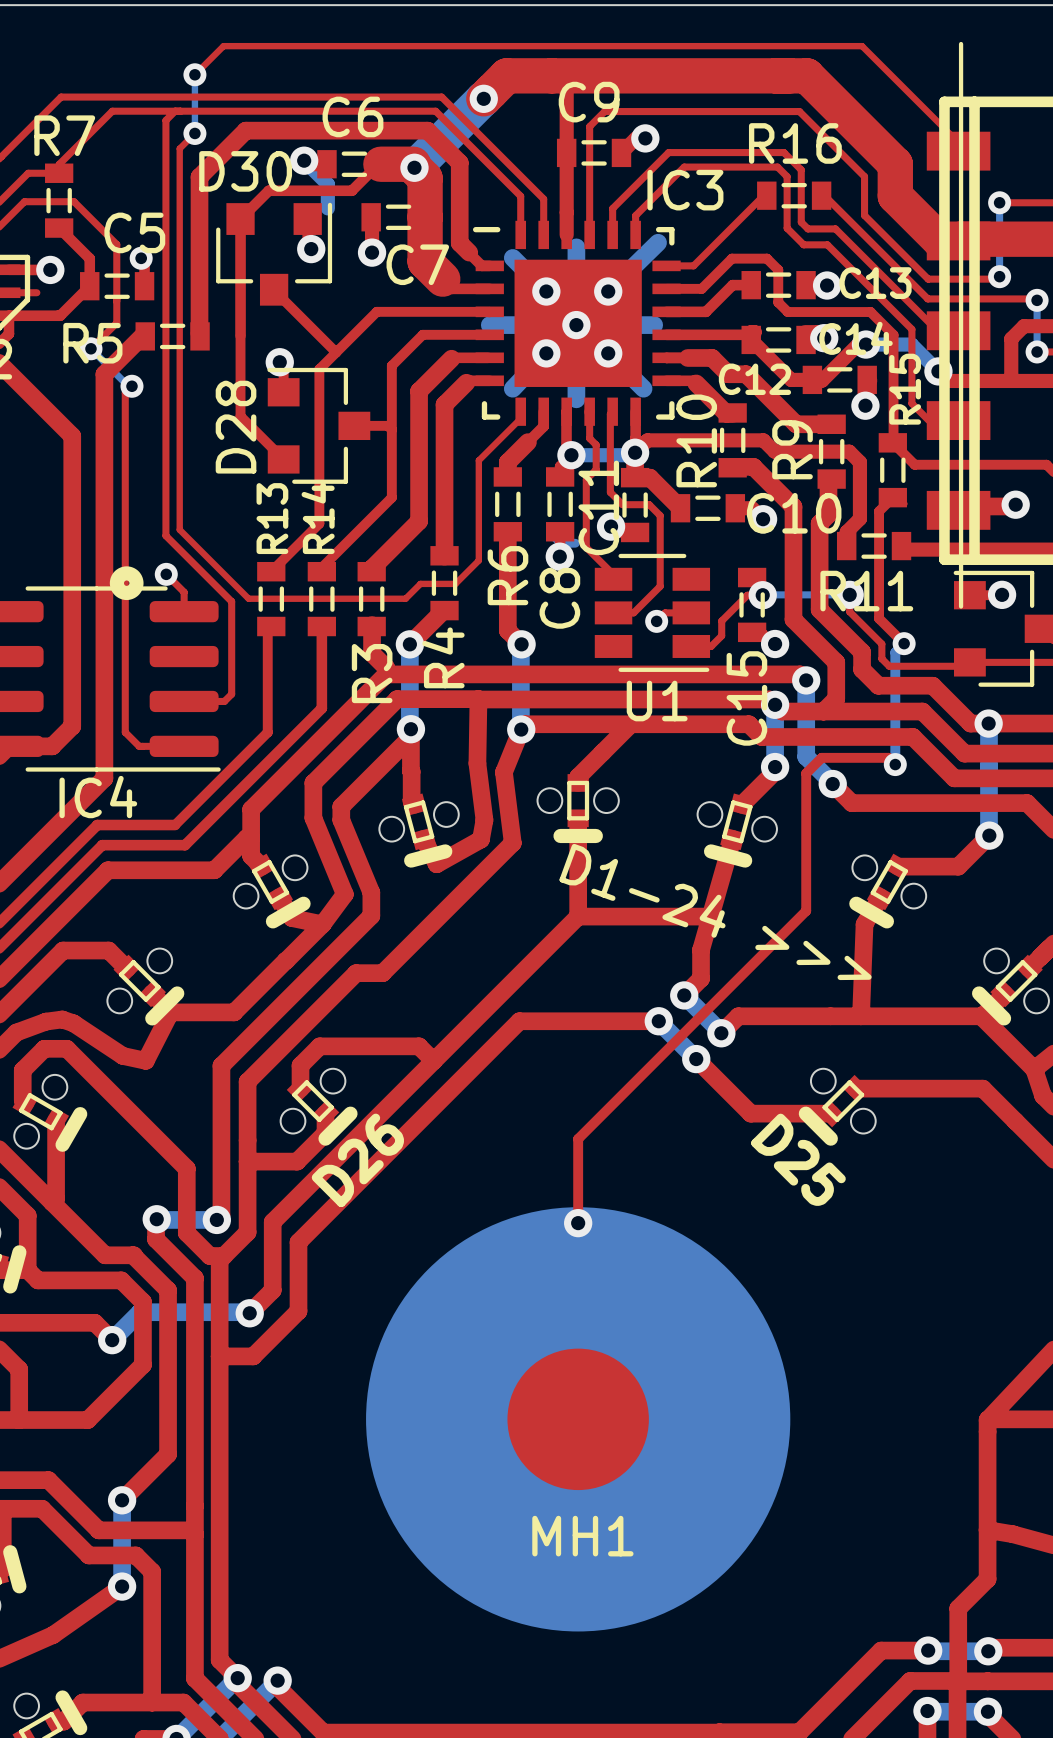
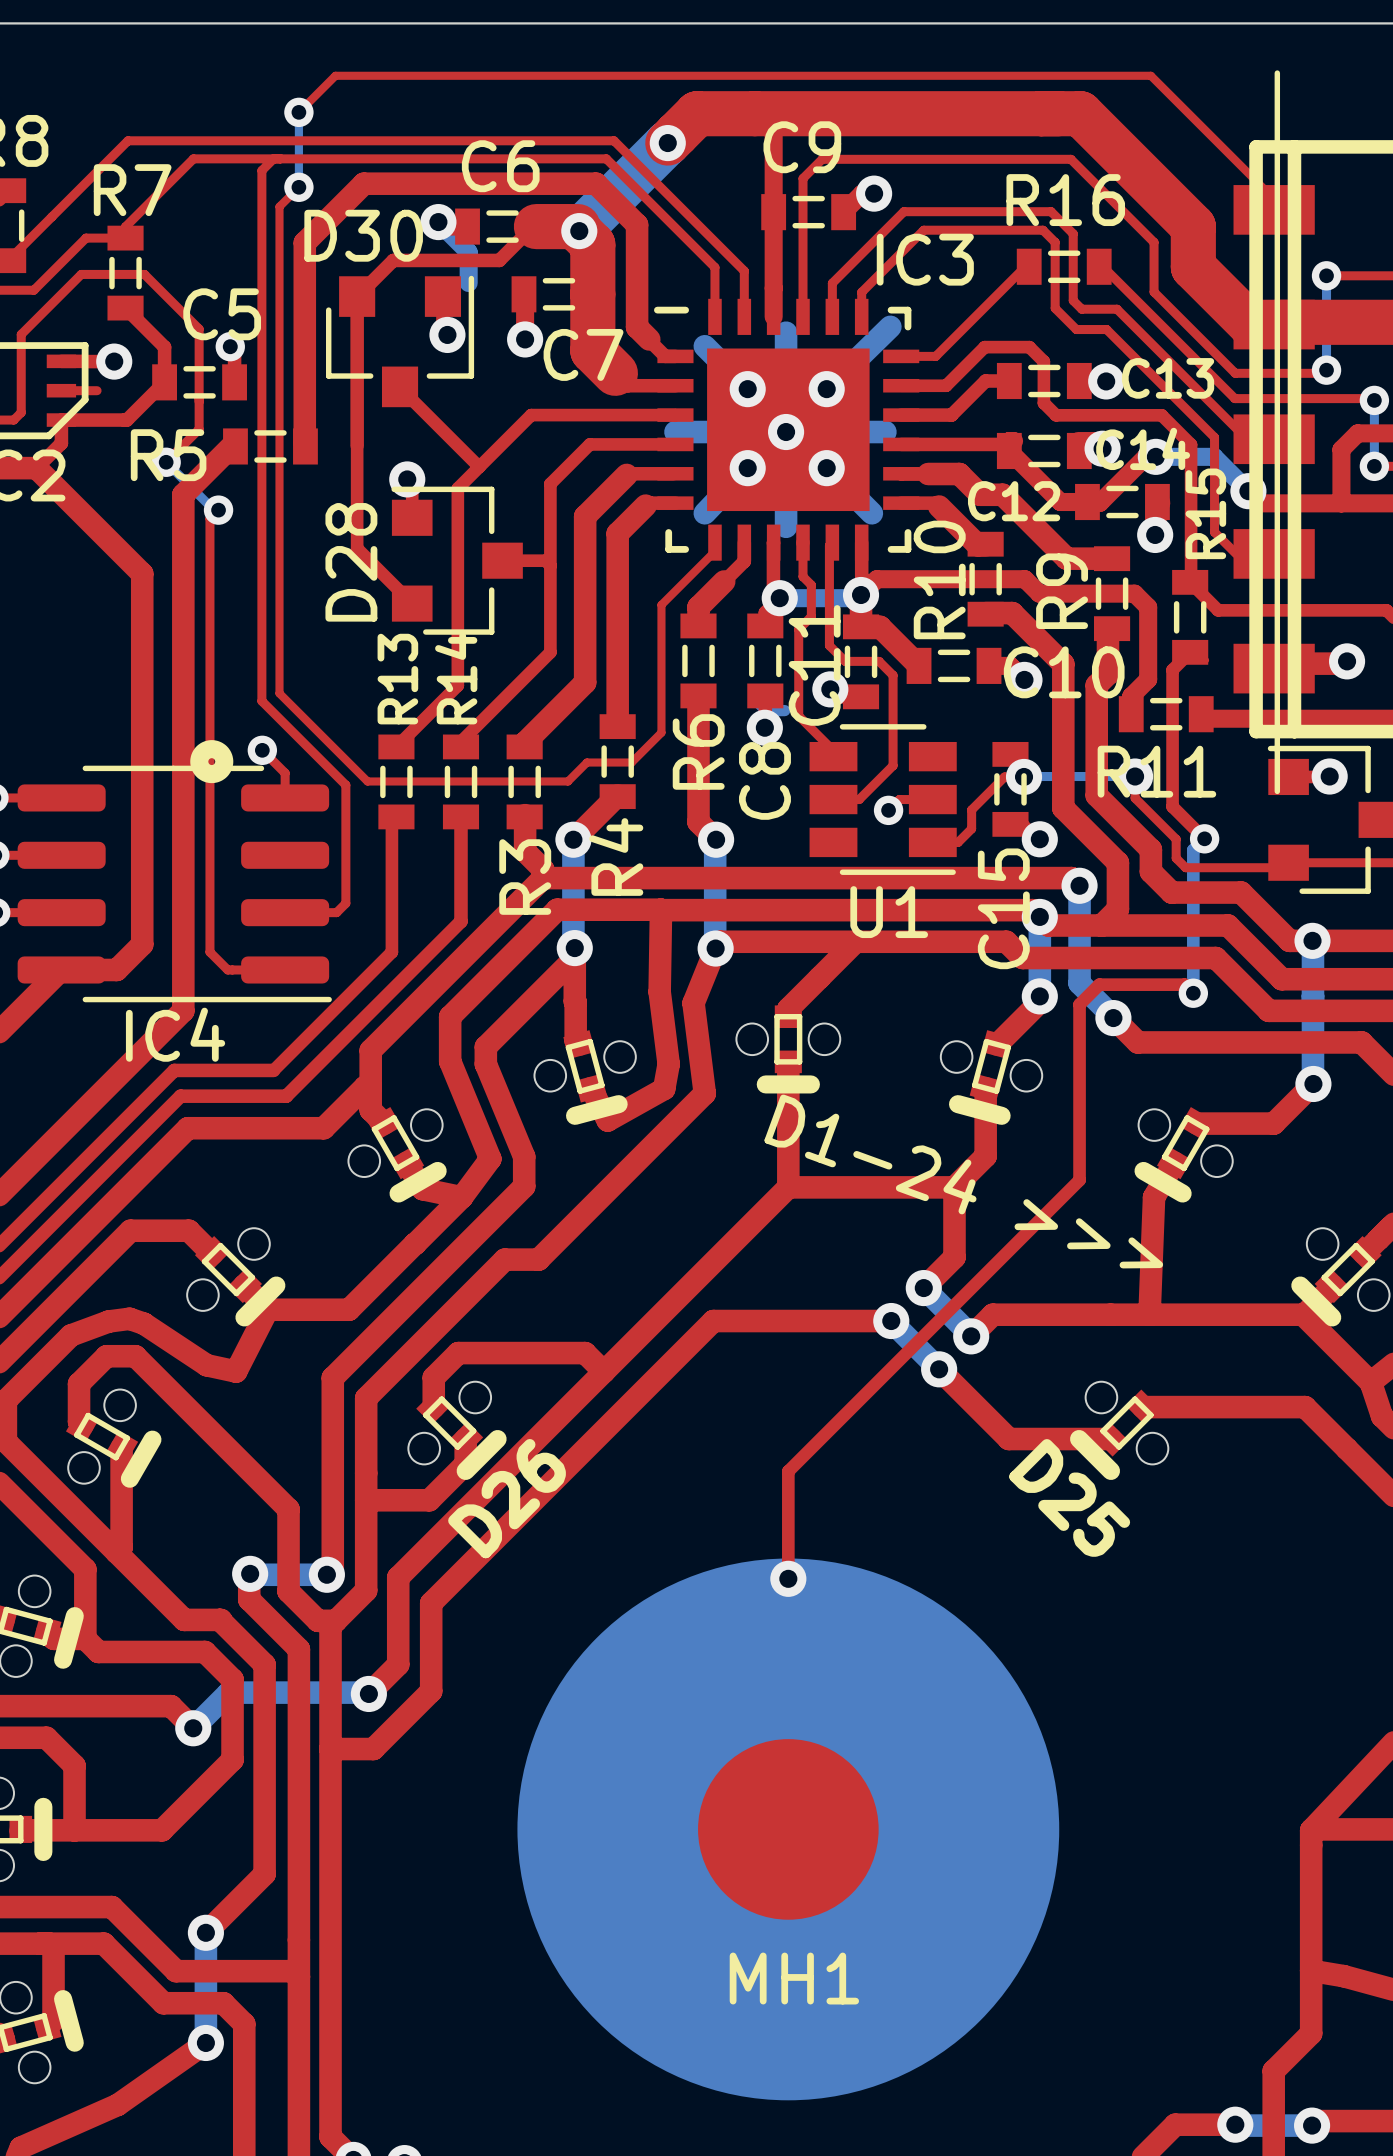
top track: (732, 838) (701, 950) (701, 978) -> (985, 1088) (985, 1156) (954, 1187) (954, 1257) (945, 1266)

